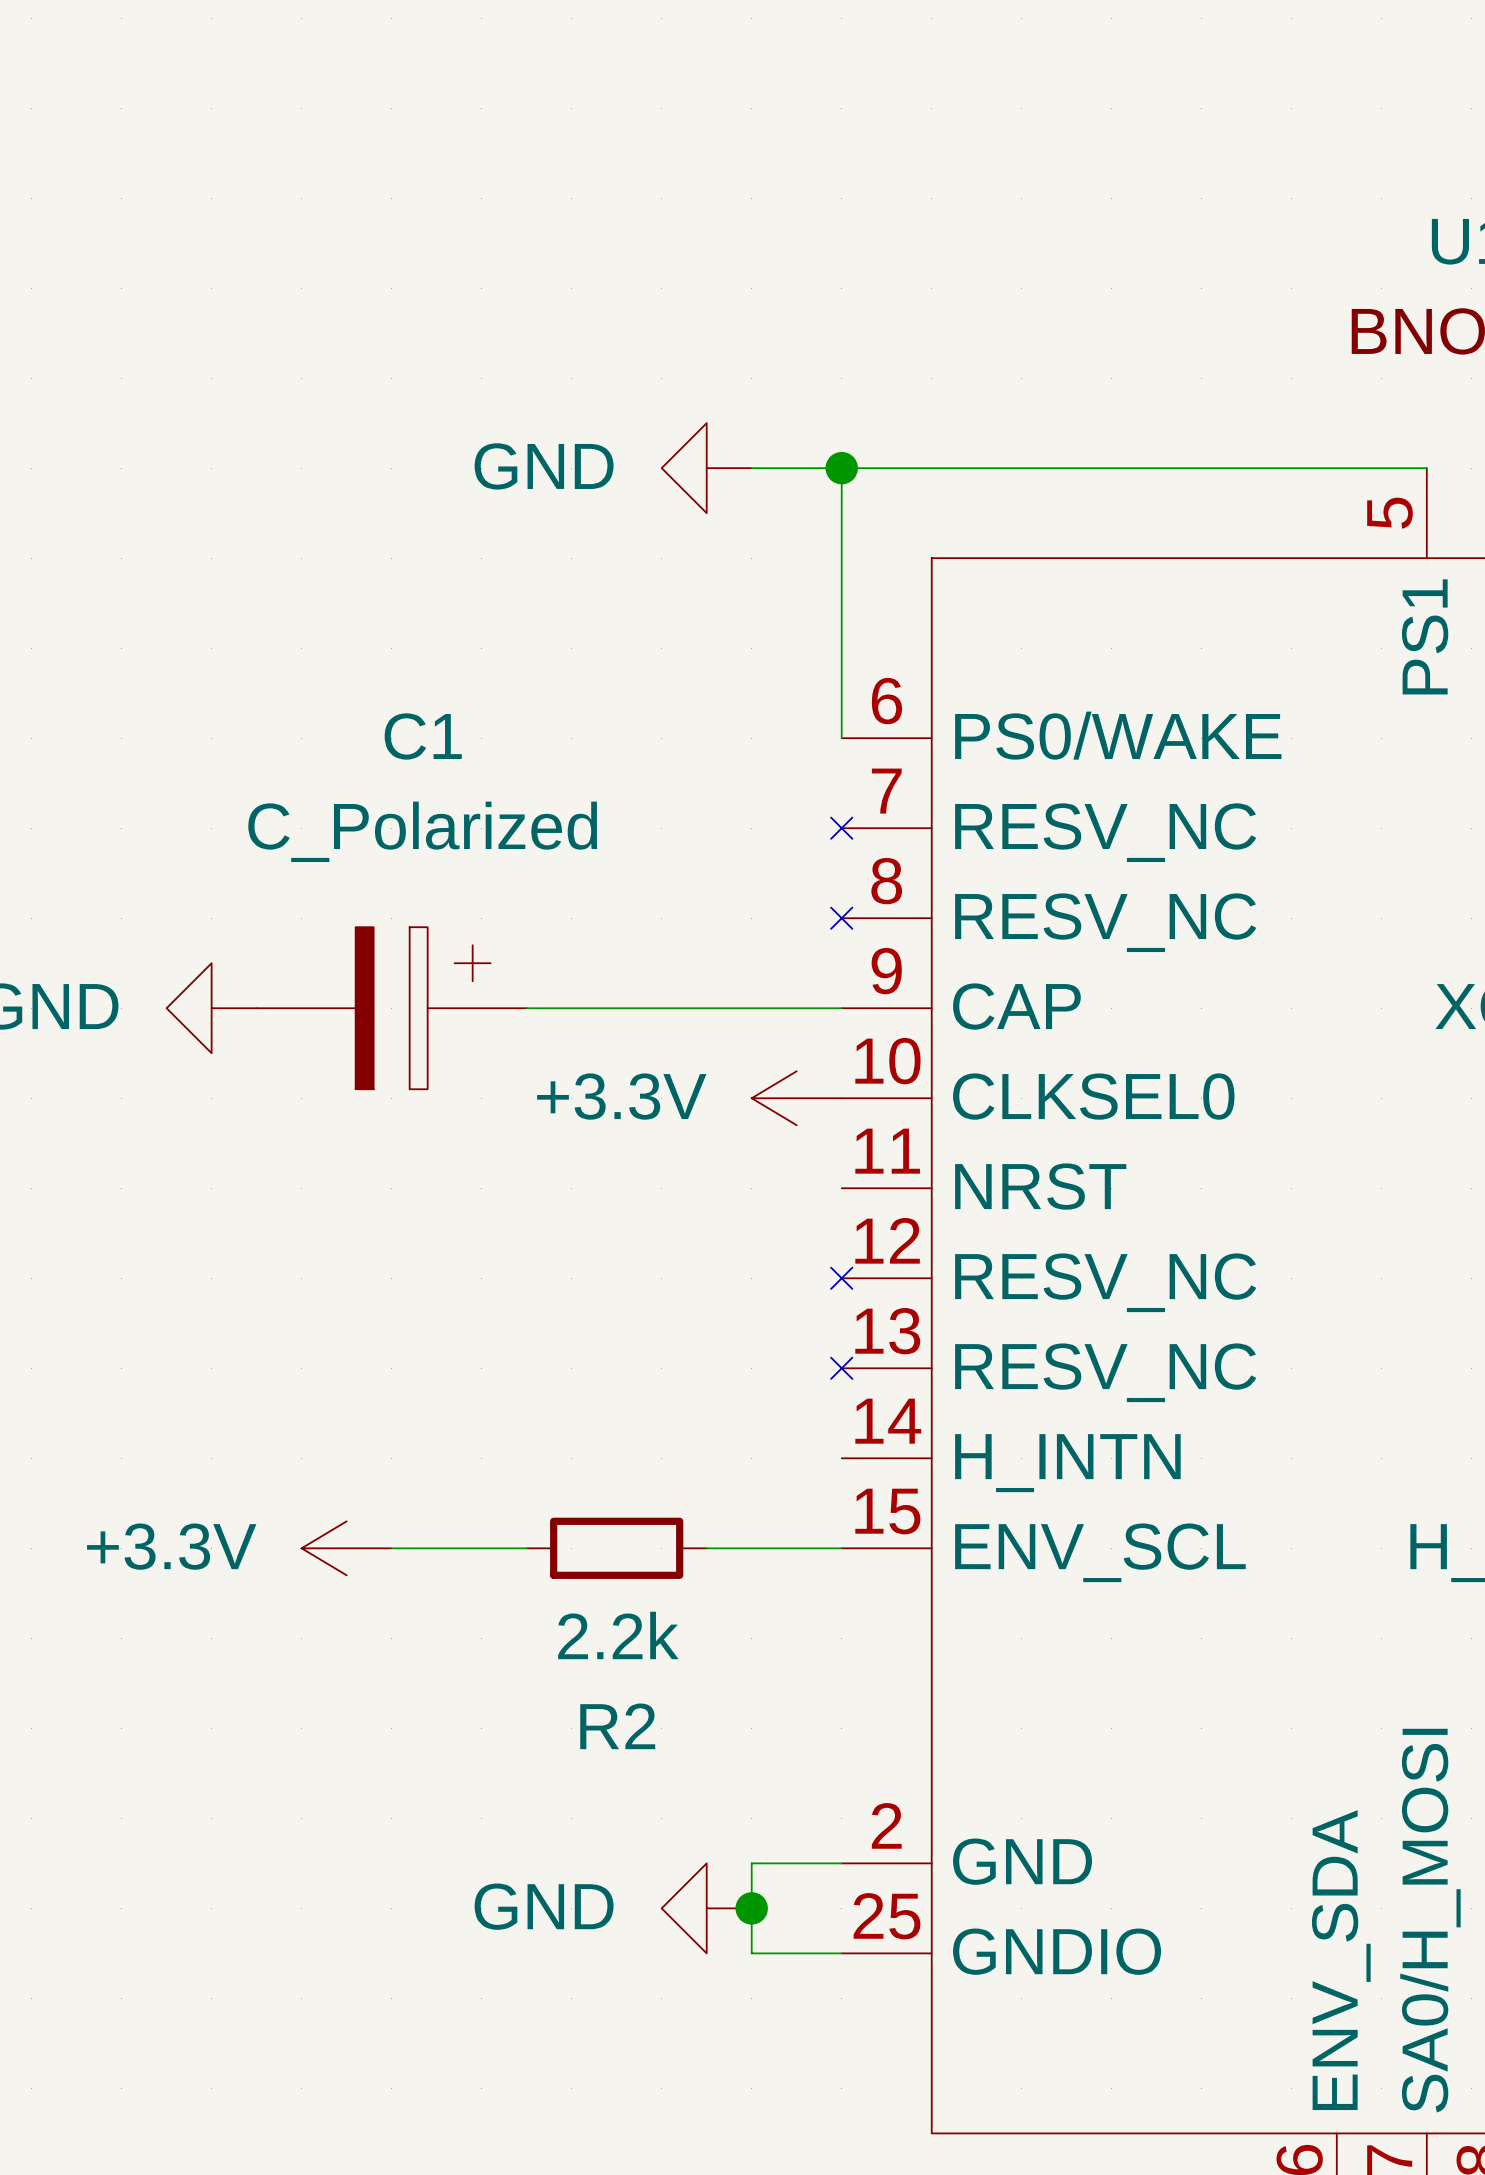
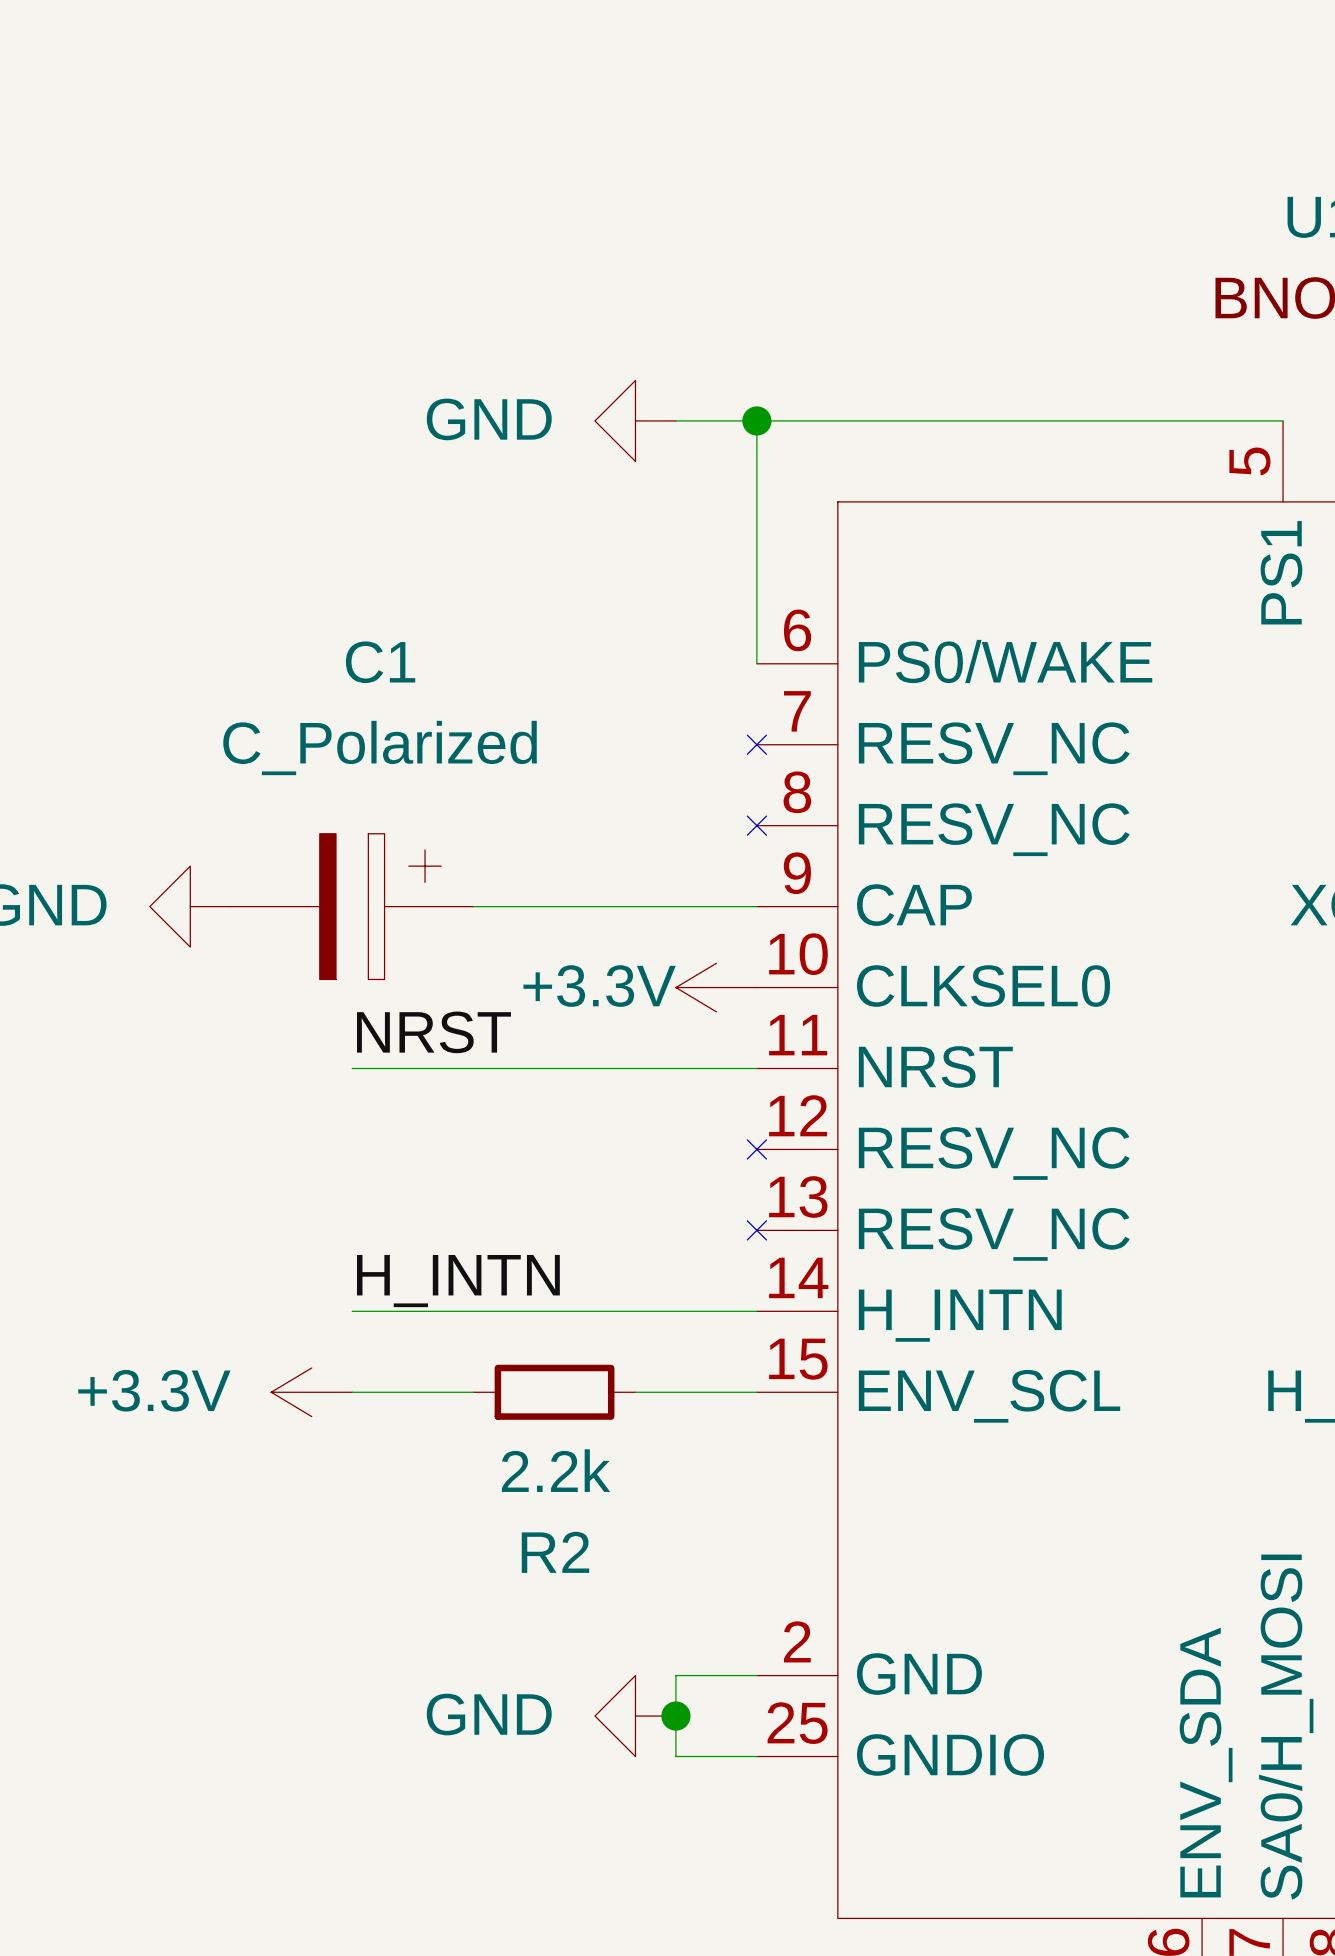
power symbol text position: +3.3V (621, 1096) -> +3.3V (599, 986)
label: none -> NRST (433, 1032)
wire: none -> (352, 1068) (756, 1068)
label: none -> H_INTN (458, 1281)
wire: none -> (352, 1311) (756, 1311)

